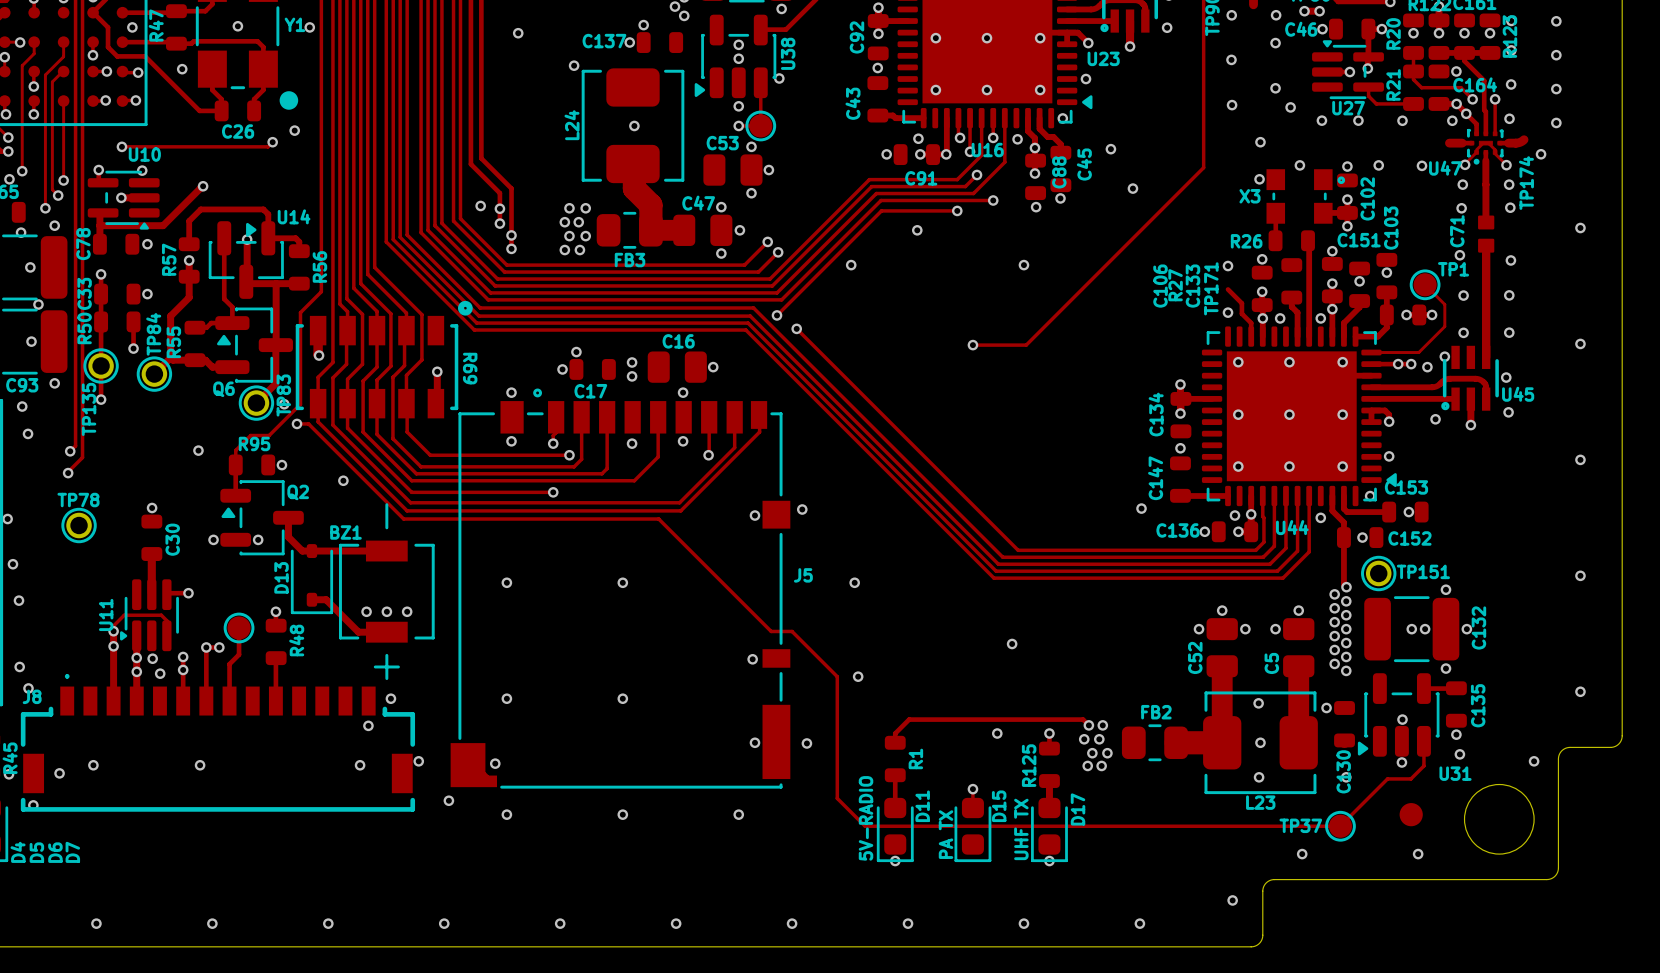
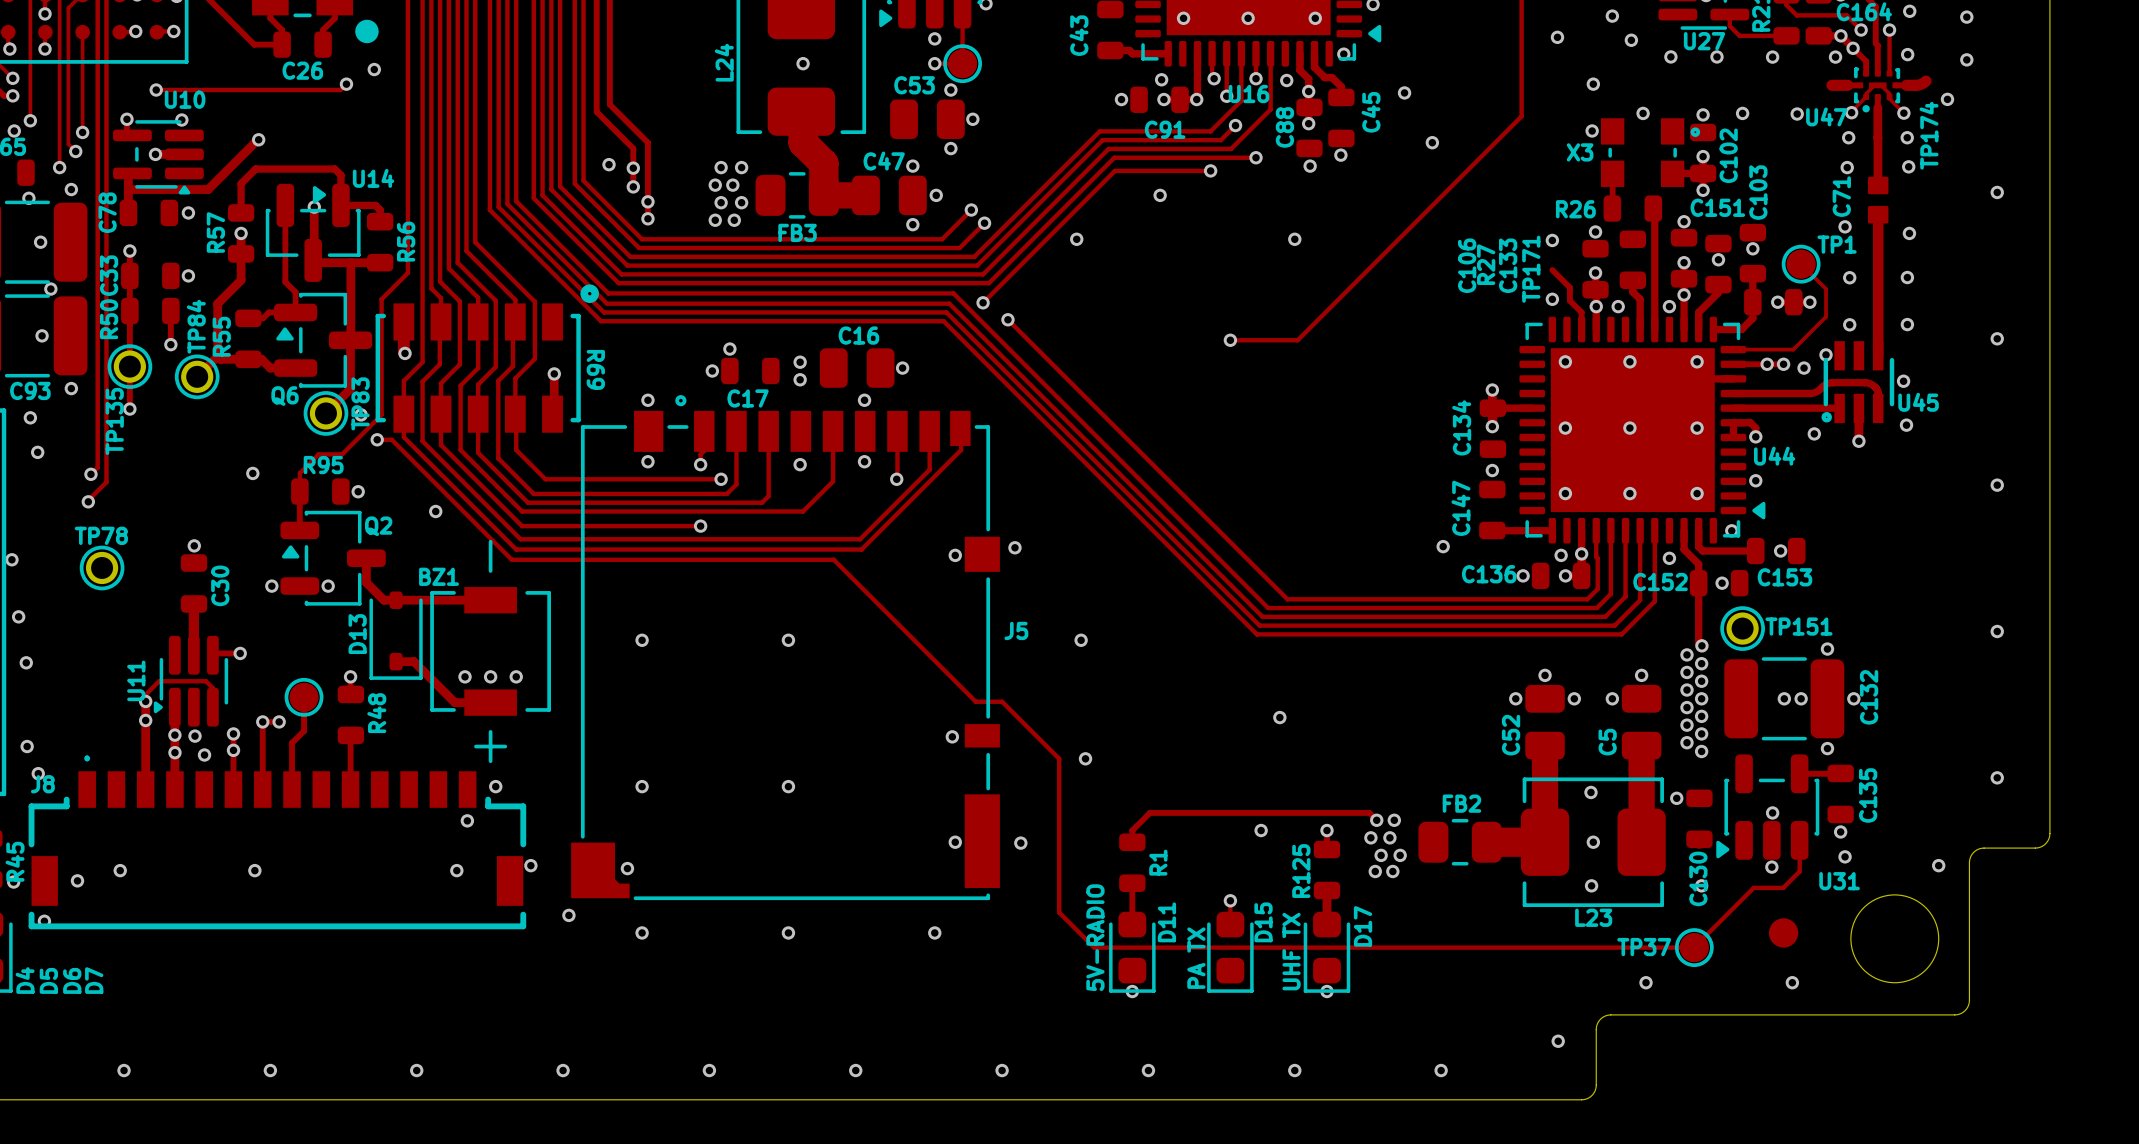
C88 name position: C88 (1059, 172) -> C88 (1284, 127)
C153 name position: C153 (1406, 487) -> C153 (1784, 577)
U44 name position: U44 (1292, 527) -> U44 (1774, 456)
C152 name position: C152 (1409, 538) -> C152 (1660, 581)

